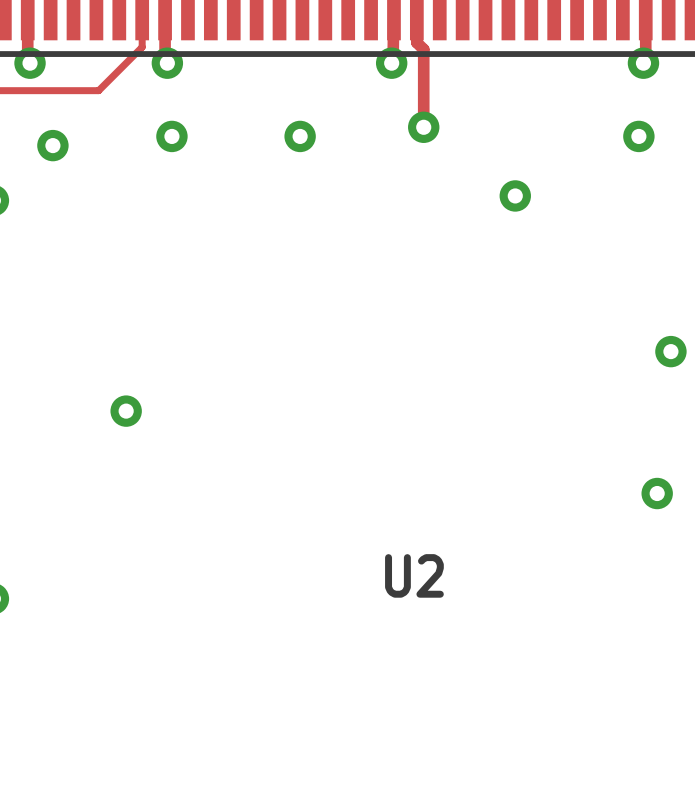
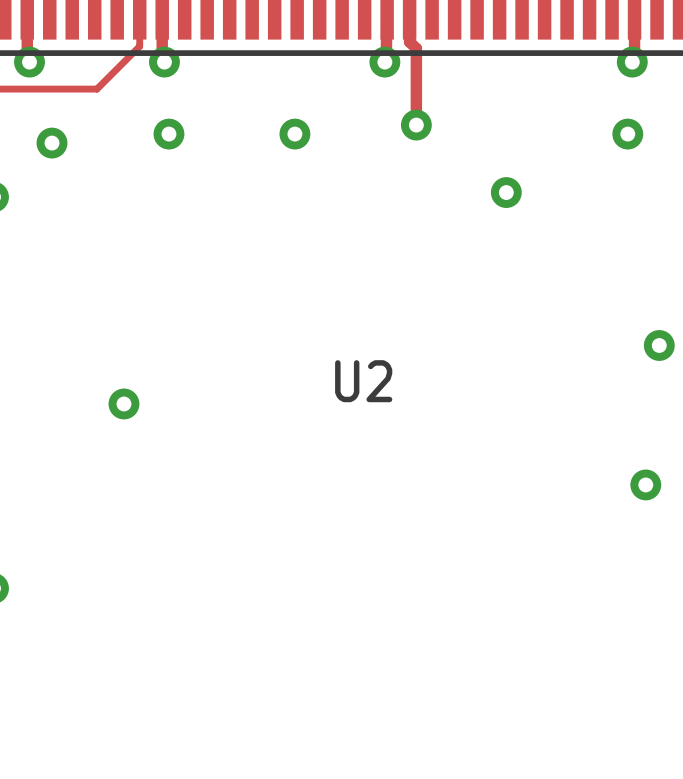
U2 name position: U2 (414, 575) -> U2 (363, 381)

